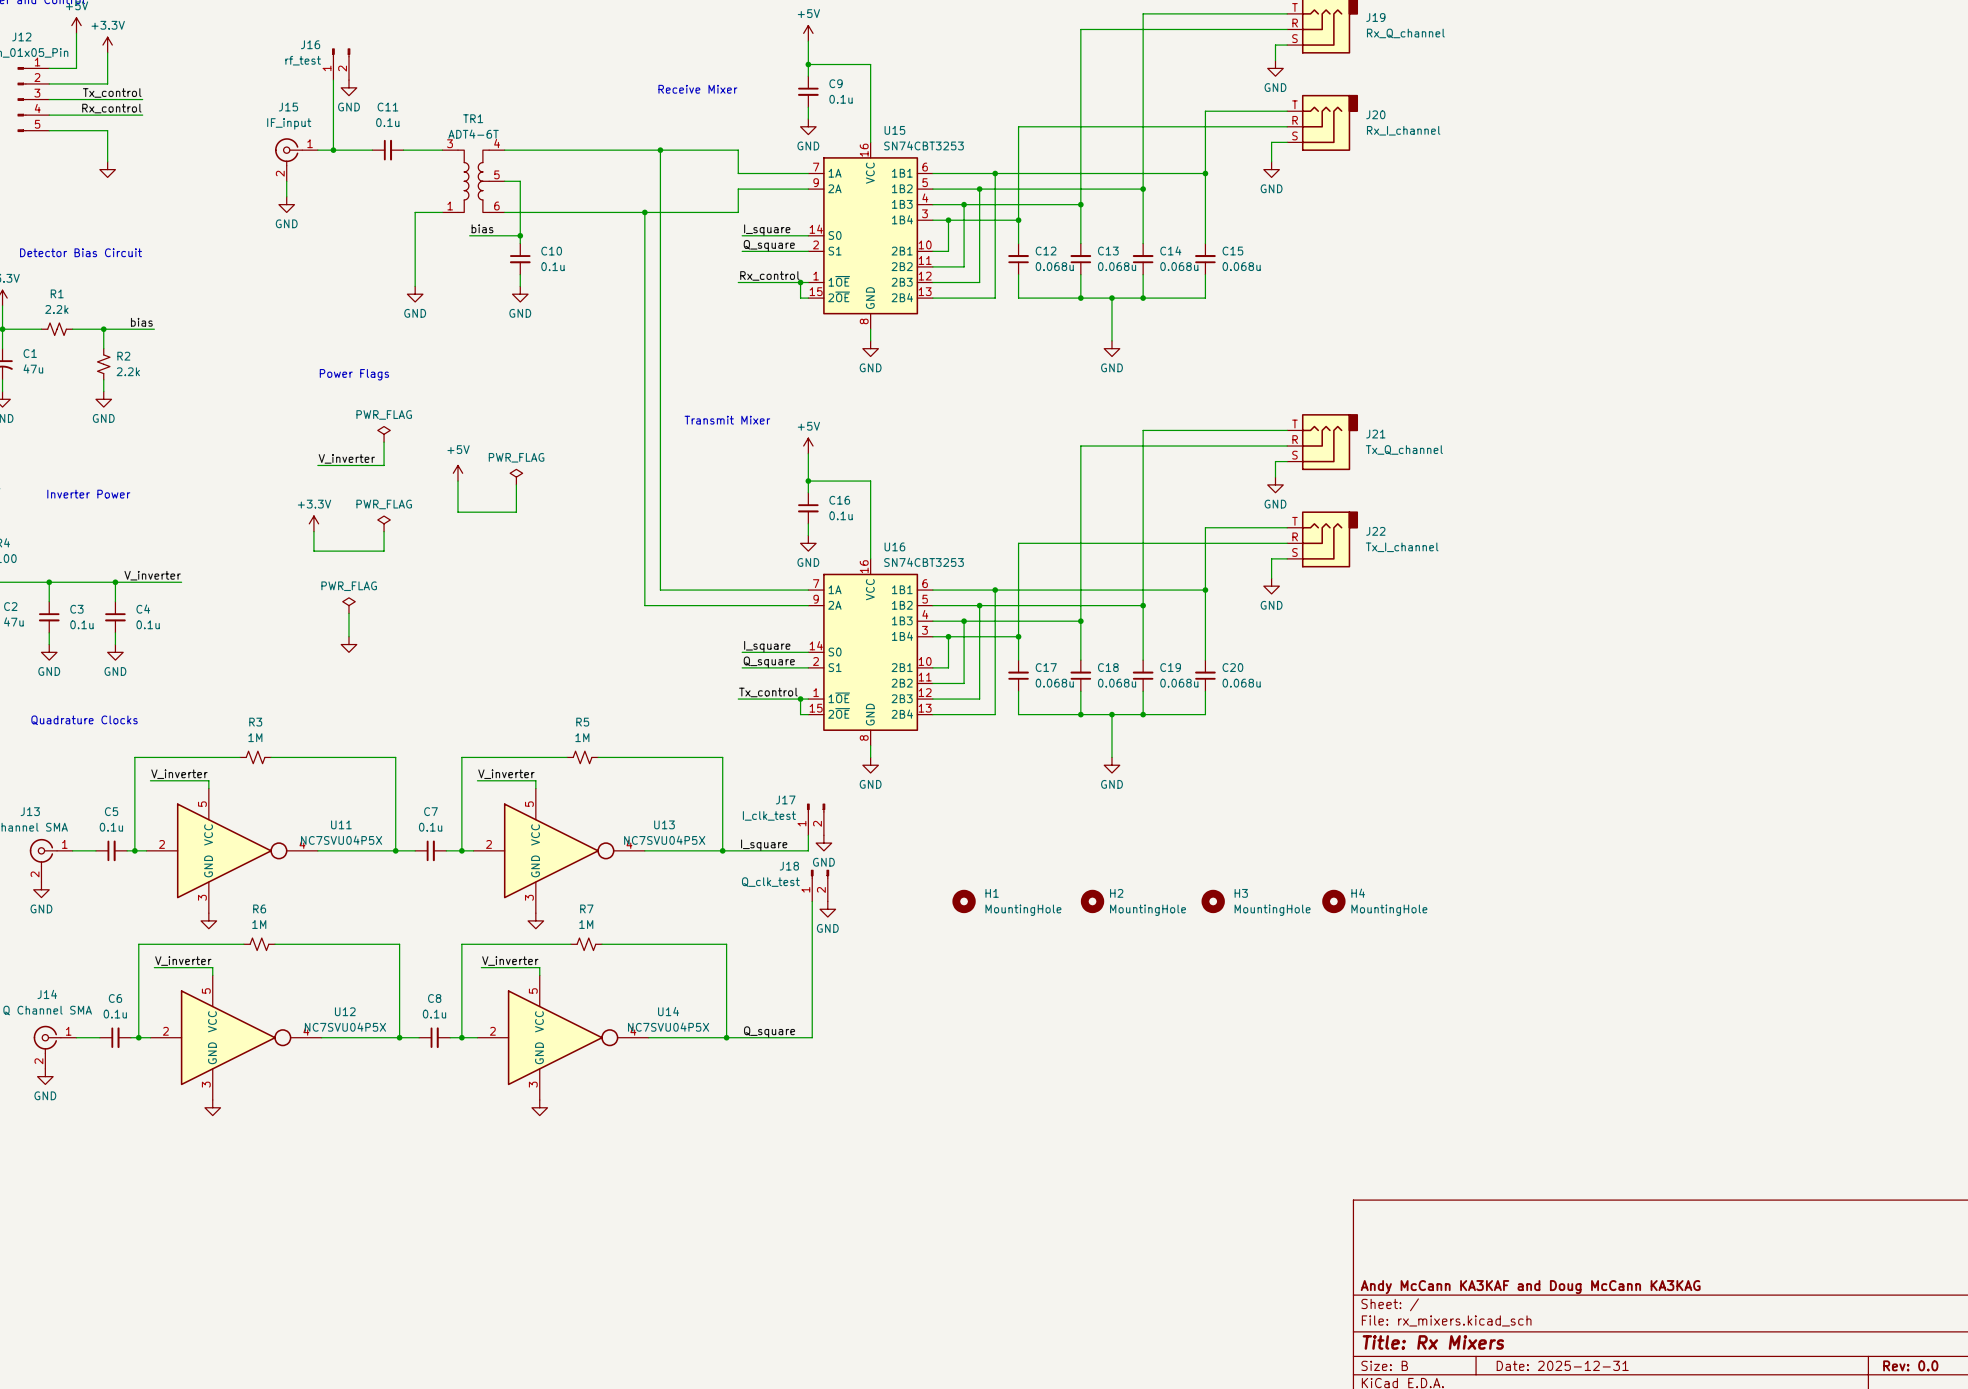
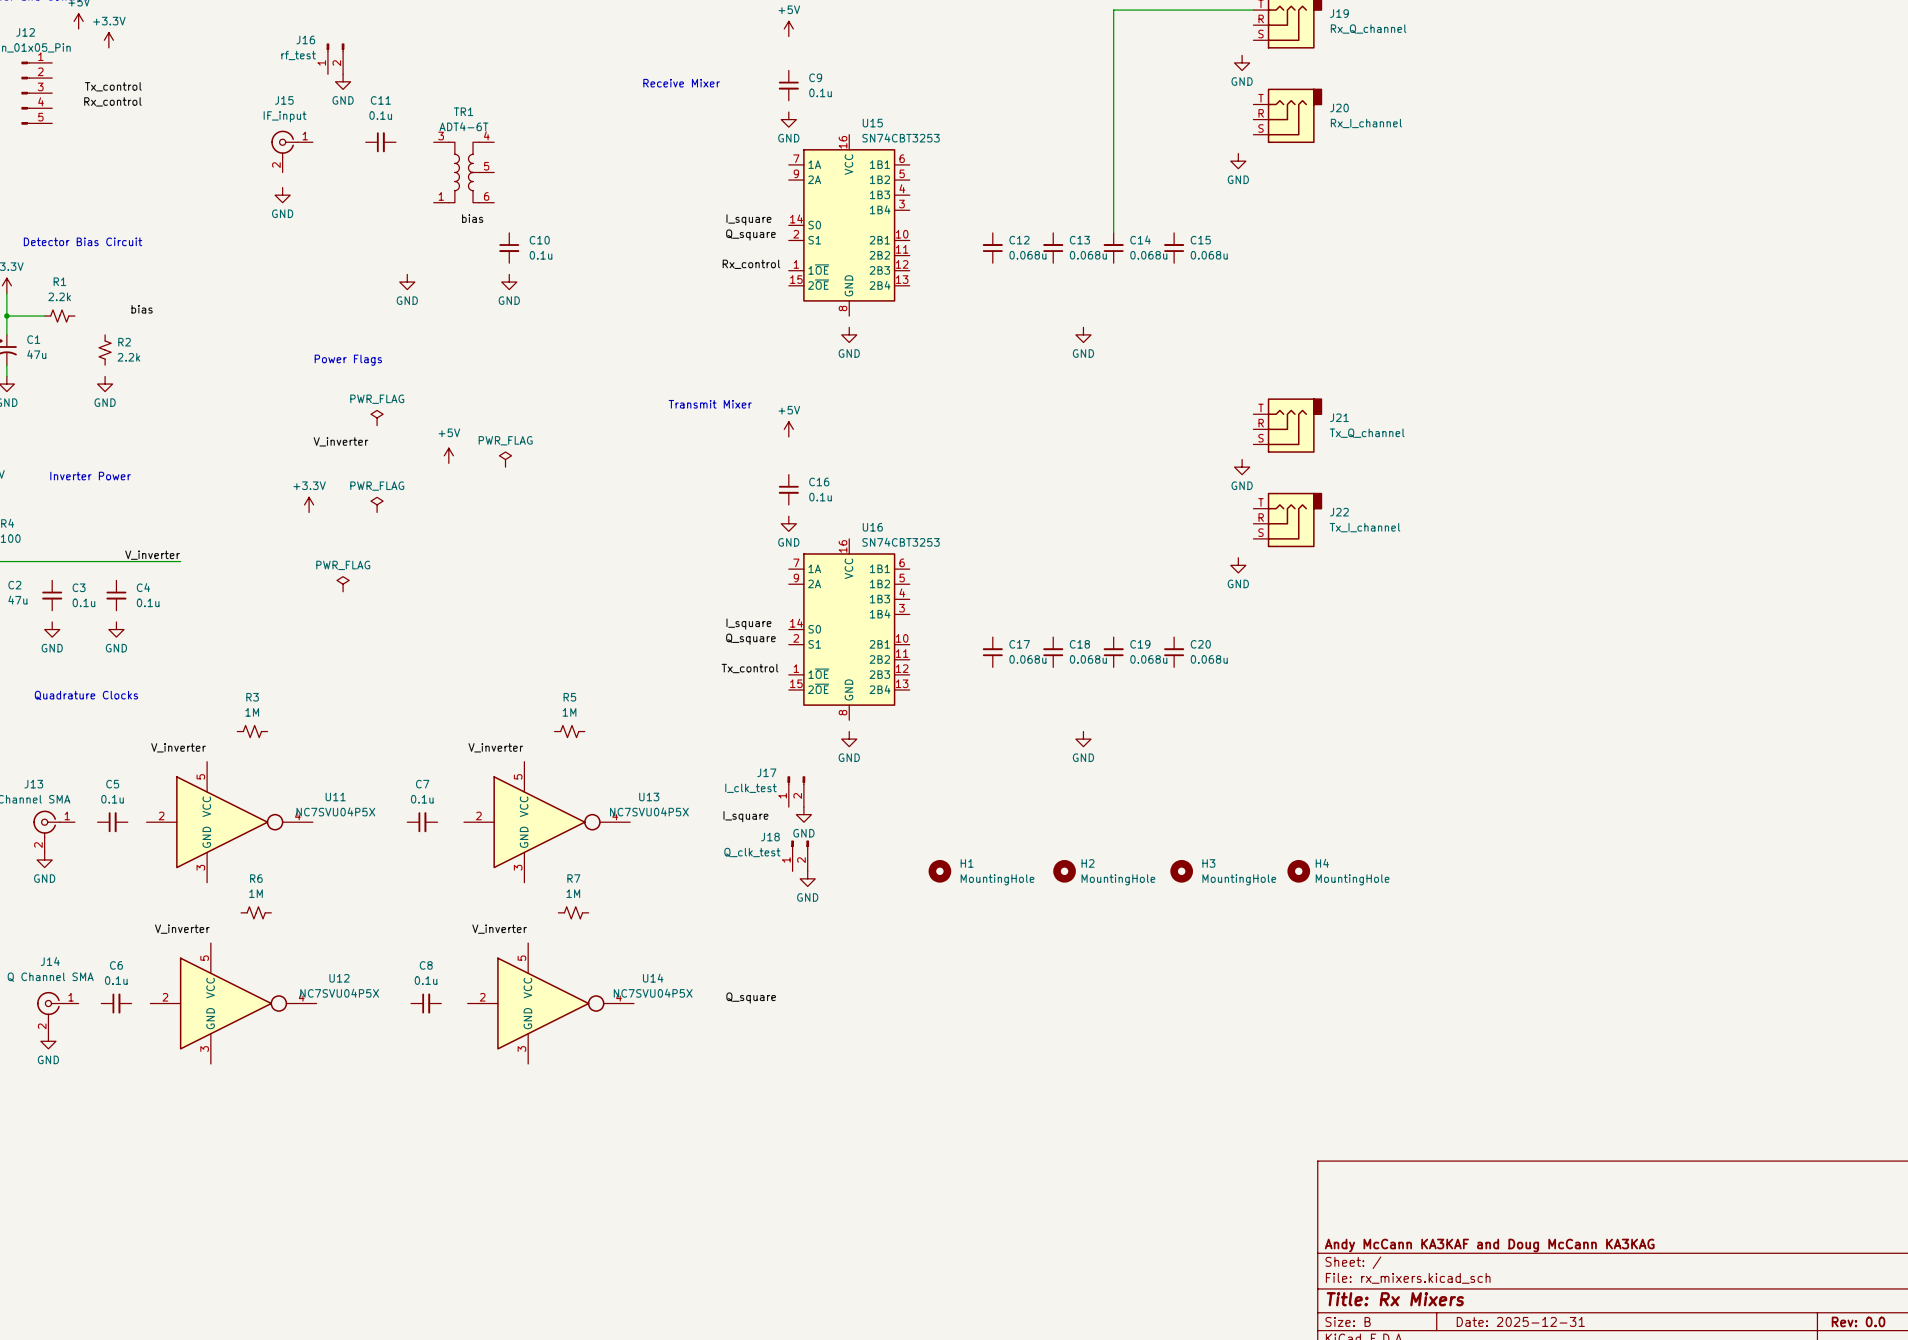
wire: (1287, 29) (1080, 29) (1080, 243) -> none
wire: (76, 33) (76, 68) (49, 68) -> none
wire: (808, 41) (808, 76) -> none
wire: (1287, 45) (1275, 45) (1275, 60) -> none
wire: (107, 52) (107, 83) (49, 83) -> none
wire: (808, 64) (870, 64) (870, 142) -> none
junction: (808, 64) -> none
wire: (333, 80) (333, 150) -> none
wire: (49, 99) (142, 99) -> none
wire: (808, 107) (808, 119) -> none
wire: (1287, 111) (1205, 111) (1205, 243) -> none
wire: (49, 115) (142, 115) -> none
wire: (1287, 126) (1018, 126) (1018, 243) -> none
wire: (49, 130) (107, 130) (107, 161) -> none
wire: (1287, 142) (1271, 142) (1271, 161) -> none
wire: (317, 150) (372, 150) -> none
junction: (333, 150) -> none
wire: (403, 150) (442, 150) -> none
wire: (504, 150) (738, 150) (738, 173) (808, 173) -> none
wire: (660, 150) (660, 590) (808, 590) -> none
junction: (660, 150) -> none
power symbol: (107, 169) -> none
wire: (932, 173) (1205, 173) -> none
wire: (995, 173) (995, 298) (932, 298) -> none
junction: (995, 173) -> none
junction: (1205, 173) -> none
wire: (286, 181) (286, 196) -> none
wire: (504, 181) (520, 181) (520, 243) -> none
wire: (808, 189) (738, 189) (738, 212) (504, 212) -> none
wire: (932, 189) (1143, 189) -> none
wire: (979, 189) (979, 282) (932, 282) -> none
junction: (979, 189) -> none
junction: (1143, 189) -> none
wire: (932, 204) (1080, 204) -> none
wire: (964, 204) (964, 266) (932, 266) -> none
junction: (964, 204) -> none
junction: (1080, 204) -> none
wire: (442, 212) (415, 212) (415, 286) -> none
wire: (644, 212) (644, 605) (808, 605) -> none
junction: (644, 212) -> none
wire: (932, 220) (1018, 220) -> none
wire: (948, 220) (948, 251) (932, 251) -> none
junction: (948, 220) -> none
junction: (1018, 220) -> none
wire: (469, 235) (520, 235) -> none
junction: (520, 235) -> none
wire: (742, 235) (808, 235) -> none
wire: (742, 251) (808, 251) -> none
wire: (520, 274) (520, 286) -> none
wire: (1018, 274) (1018, 298) (1205, 298) (1205, 274) -> none
wire: (1080, 274) (1080, 298) -> none
wire: (1143, 274) (1143, 298) -> none
wire: (738, 282) (808, 282) -> none
wire: (800, 282) (800, 298) (808, 298) -> none
junction: (800, 282) -> none
junction: (1080, 298) -> none
wire: (1111, 298) (1111, 340) -> none
junction: (1111, 298) -> none
junction: (1143, 298) -> none
wire: (72, 329) (154, 329) -> none
wire: (103, 329) (103, 348) -> none
junction: (103, 329) -> none
wire: (870, 329) (870, 340) -> none
wire: (103, 379) (103, 391) -> none
wire: (1287, 430) (1143, 430) (1143, 660) -> none
wire: (384, 442) (384, 465) (317, 465) -> none
wire: (1287, 446) (1080, 446) (1080, 660) -> none
wire: (808, 453) (808, 492) -> none
wire: (1287, 461) (1275, 461) (1275, 477) -> none
wire: (457, 481) (457, 512) (516, 512) (516, 484) -> none
wire: (808, 481) (870, 481) (870, 558) -> none
junction: (808, 481) -> none
wire: (808, 523) (808, 535) -> none
wire: (1287, 527) (1205, 527) (1205, 660) -> none
wire: (313, 531) (313, 551) (384, 551) (384, 531) -> none
wire: (1287, 543) (1018, 543) (1018, 660) -> none
wire: (1287, 558) (1271, 558) (1271, 578) -> none
wire: (49, 582) (49, 601) -> none
junction: (49, 582) -> none
wire: (115, 582) (115, 601) -> none
junction: (115, 582) -> none
wire: (932, 590) (1205, 590) -> none
wire: (995, 590) (995, 714) (932, 714) -> none
junction: (995, 590) -> none
junction: (1205, 590) -> none
wire: (932, 605) (1143, 605) -> none
wire: (979, 605) (979, 699) (932, 699) -> none
junction: (979, 605) -> none
junction: (1143, 605) -> none
wire: (348, 613) (348, 636) -> none
wire: (932, 621) (1080, 621) -> none
wire: (964, 621) (964, 683) (932, 683) -> none
junction: (964, 621) -> none
junction: (1080, 621) -> none
wire: (49, 632) (49, 644) -> none
wire: (115, 632) (115, 644) -> none
wire: (932, 636) (1018, 636) -> none
wire: (948, 636) (948, 667) (932, 667) -> none
junction: (948, 636) -> none
junction: (1018, 636) -> none
power symbol: (348, 644) -> none
wire: (742, 652) (808, 652) -> none
wire: (742, 667) (808, 667) -> none
wire: (1018, 691) (1018, 714) (1205, 714) (1205, 691) -> none
wire: (1080, 691) (1080, 714) -> none
wire: (1143, 691) (1143, 714) -> none
wire: (738, 699) (808, 699) -> none
wire: (800, 699) (800, 714) (808, 714) -> none
junction: (800, 699) -> none
junction: (1080, 714) -> none
wire: (1111, 714) (1111, 757) -> none
junction: (1111, 714) -> none
junction: (1143, 714) -> none
wire: (870, 745) (870, 757) -> none
wire: (239, 757) (134, 757) (134, 850) -> none
wire: (271, 757) (395, 757) (395, 850) -> none
wire: (566, 757) (461, 757) (461, 850) -> none
wire: (598, 757) (722, 757) (722, 850) -> none
wire: (150, 780) (208, 780) (208, 788) -> none
wire: (477, 780) (535, 780) (535, 788) -> none
wire: (808, 835) (808, 850) (644, 850) -> none
wire: (72, 850) (95, 850) -> none
wire: (127, 850) (146, 850) -> none
junction: (134, 850) -> none
wire: (317, 850) (415, 850) -> none
junction: (395, 850) -> none
wire: (446, 850) (473, 850) -> none
junction: (461, 850) -> none
junction: (722, 850) -> none
wire: (812, 901) (812, 1037) (648, 1037) -> none
power symbol: (208, 920) -> none
power symbol: (535, 920) -> none
wire: (243, 944) (138, 944) (138, 1037) -> none
wire: (275, 944) (399, 944) (399, 1037) -> none
wire: (570, 944) (461, 944) (461, 1037) -> none
wire: (602, 944) (726, 944) (726, 1037) -> none
wire: (154, 967) (212, 967) (212, 975) -> none
wire: (481, 967) (539, 967) (539, 975) -> none
wire: (76, 1037) (99, 1037) -> none
wire: (130, 1037) (150, 1037) -> none
junction: (138, 1037) -> none
wire: (321, 1037) (419, 1037) -> none
junction: (399, 1037) -> none
wire: (450, 1037) (477, 1037) -> none
junction: (461, 1037) -> none
junction: (726, 1037) -> none
power symbol: (212, 1107) -> none
power symbol: (539, 1107) -> none

